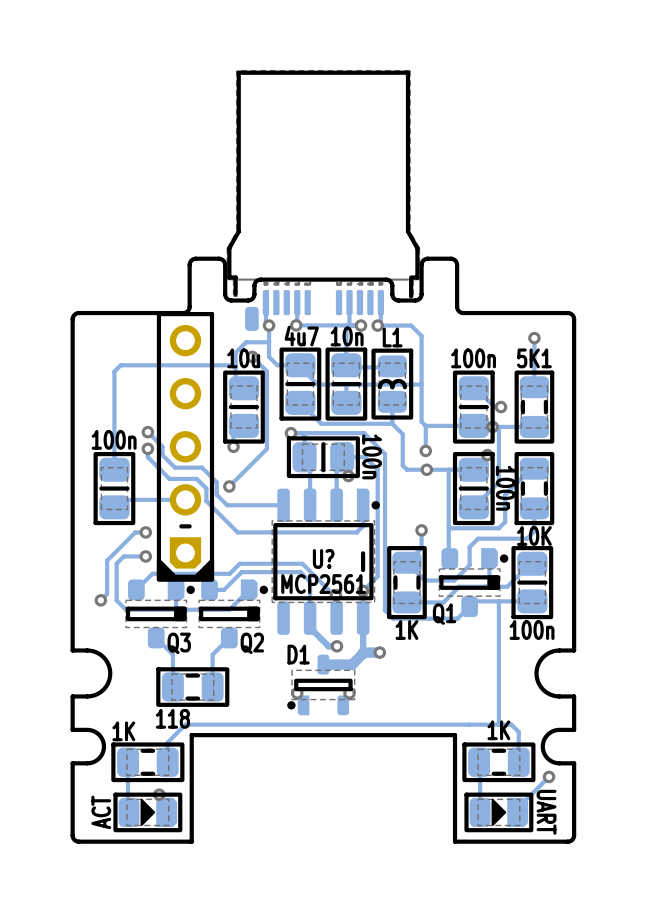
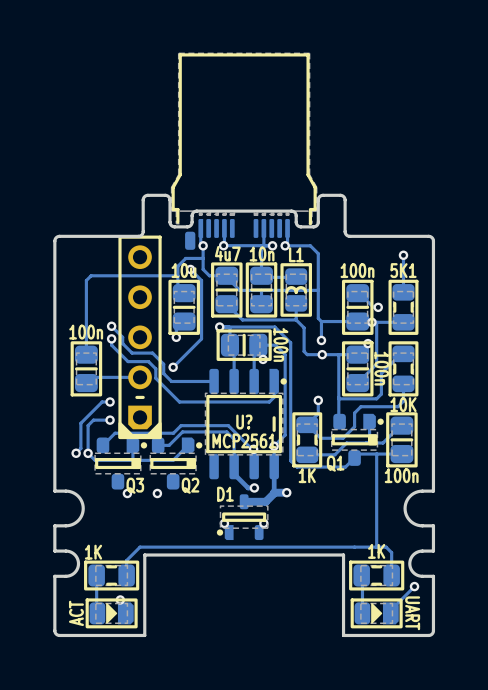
via: none -> (88, 453)
track: (156, 637) (172, 654) (172, 687) -> none
track: (229, 637) (212, 654) (212, 687) -> none
via: none -> (127, 493)
via: none -> (157, 493)
part: 118 (192, 687) -> none

